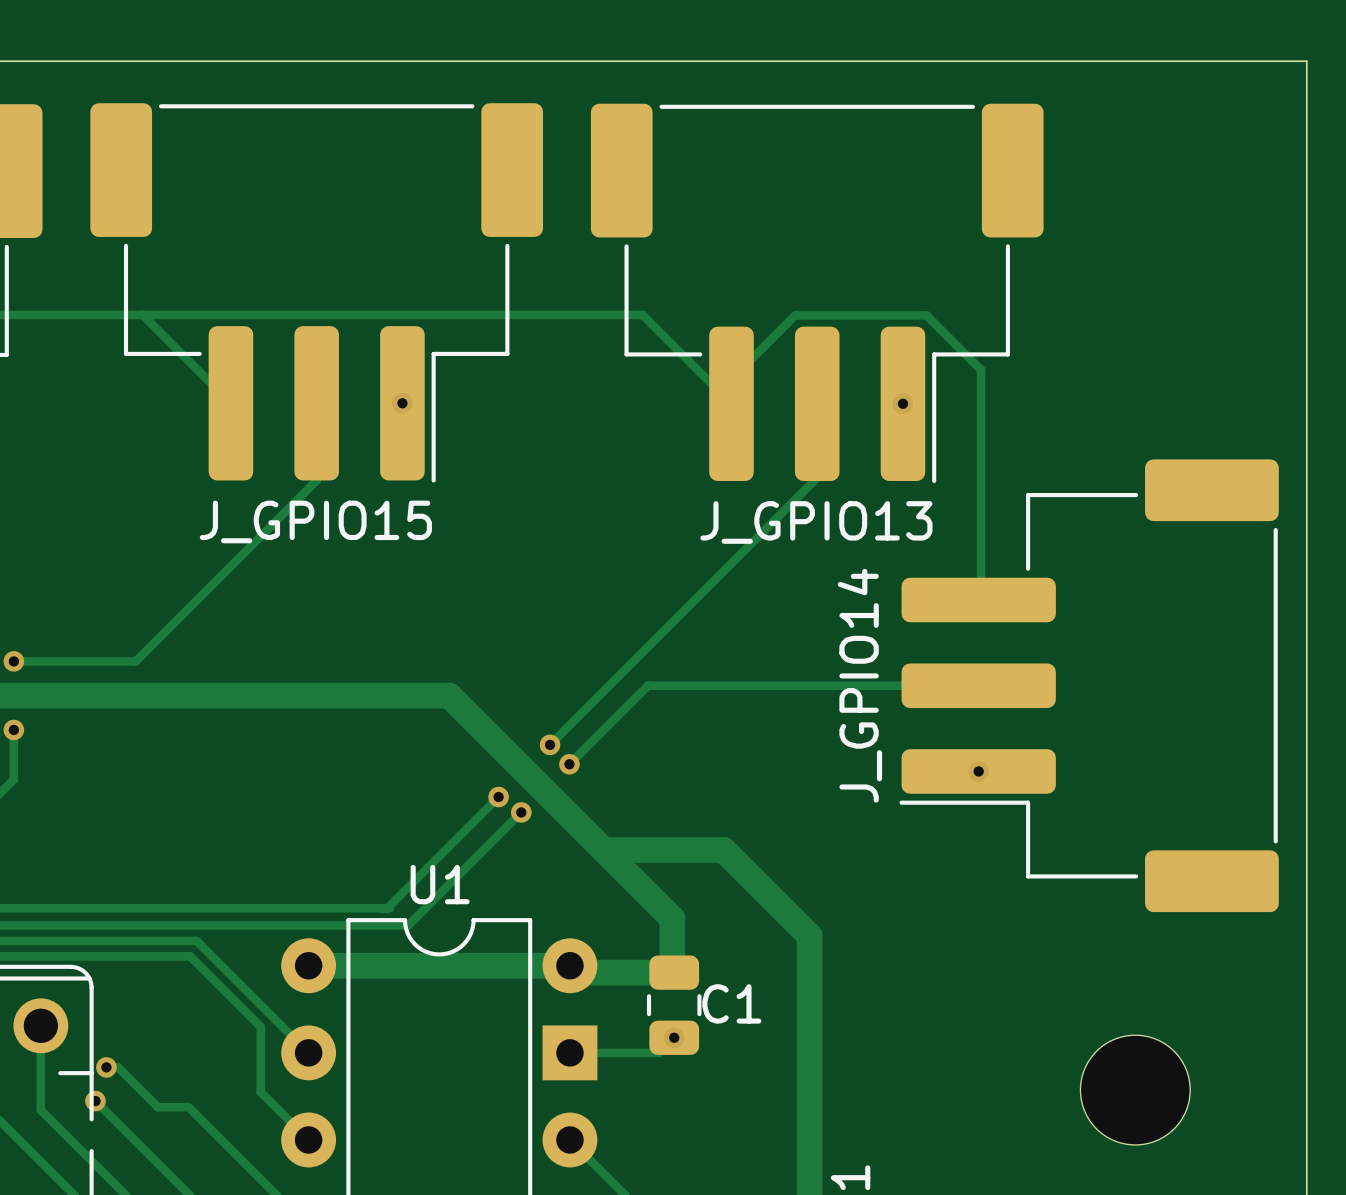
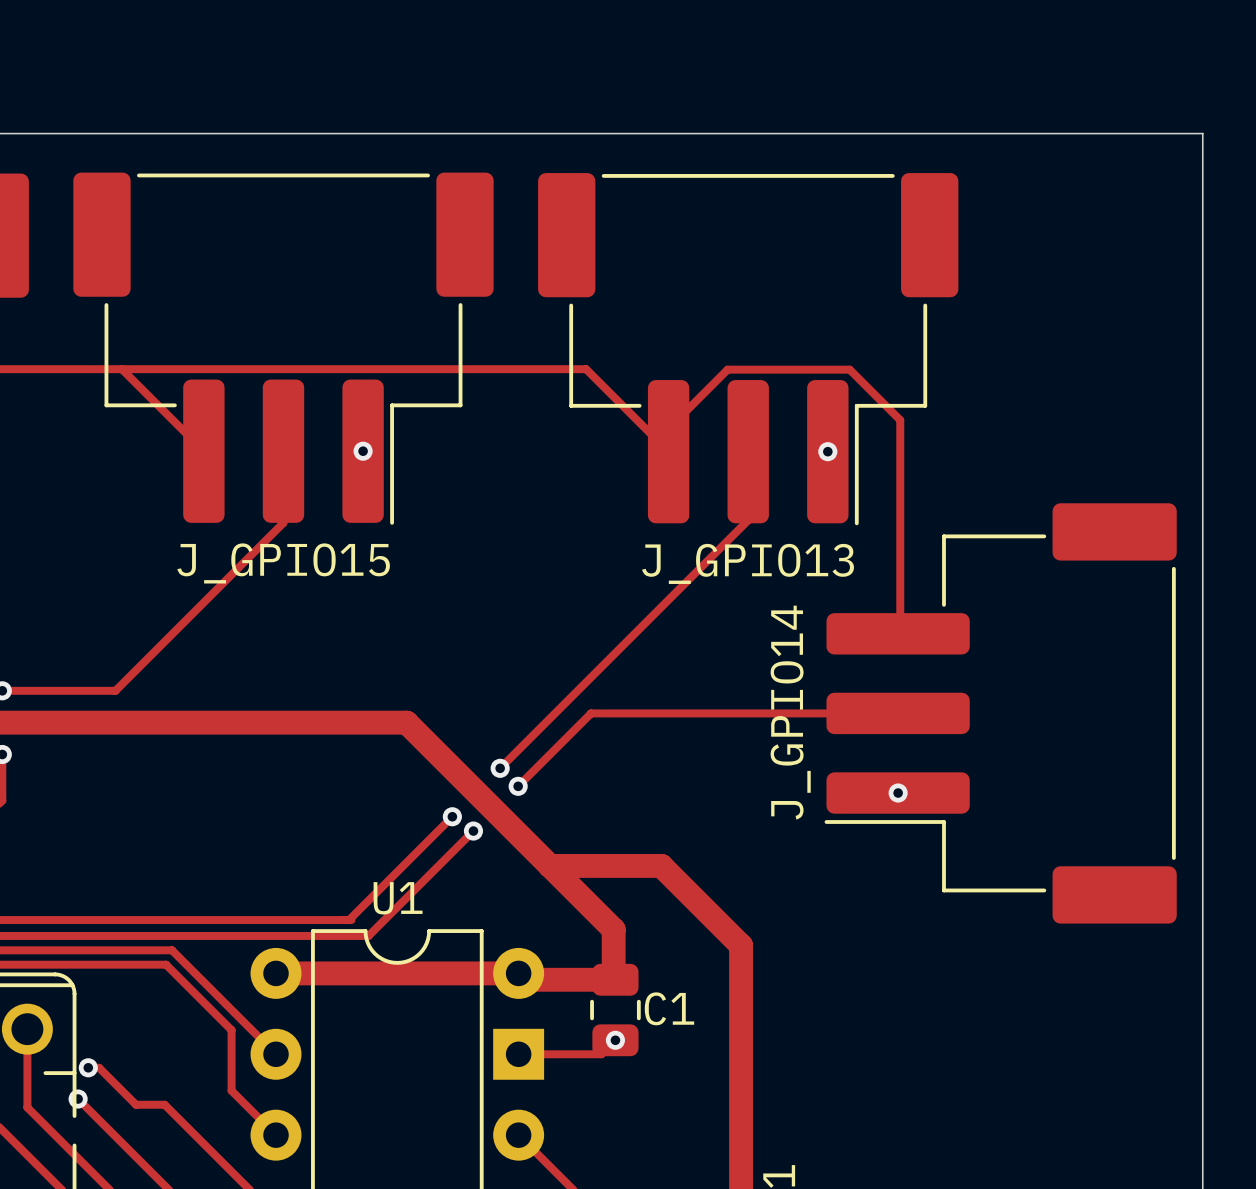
part: (1135, 1090) -> none

